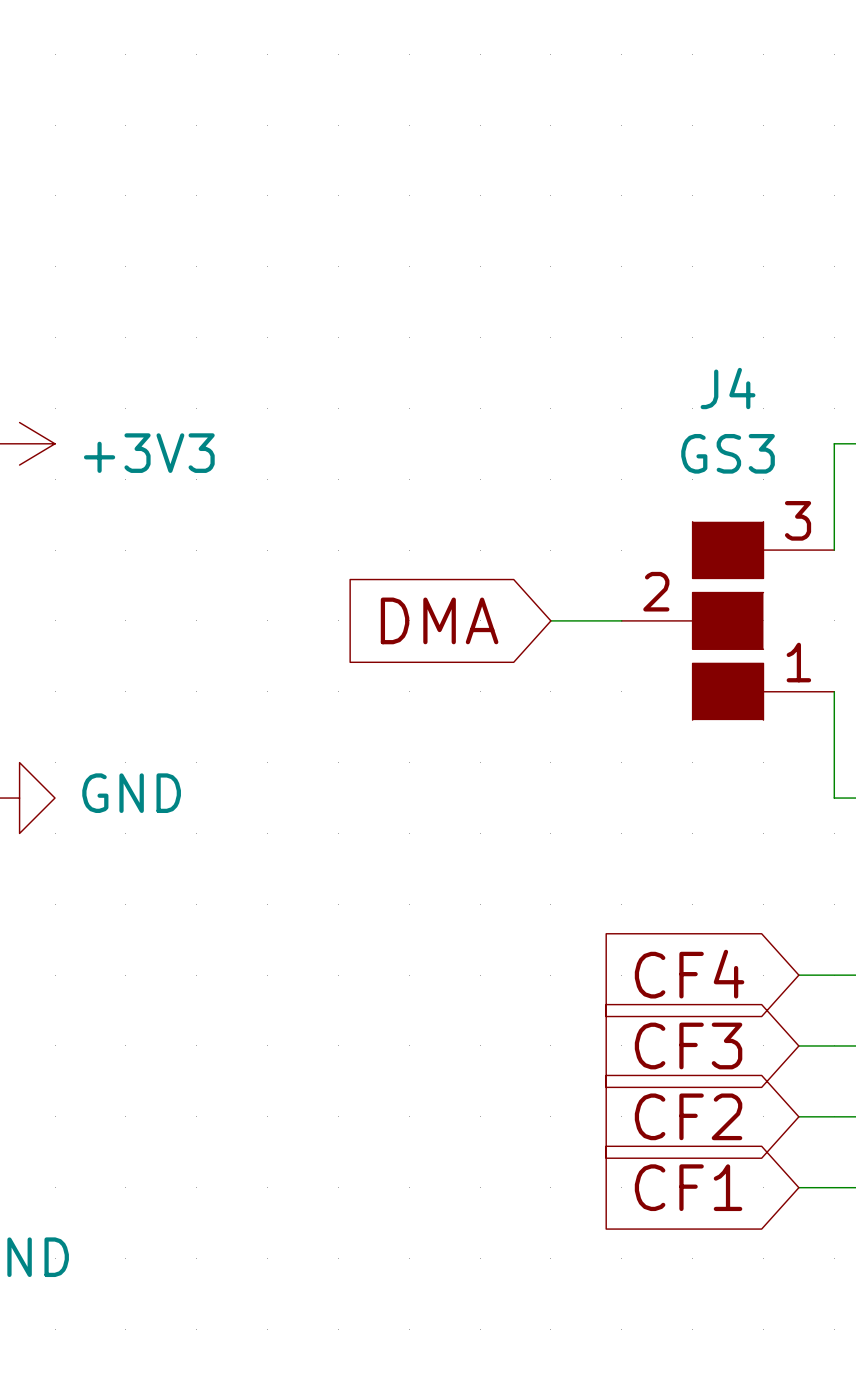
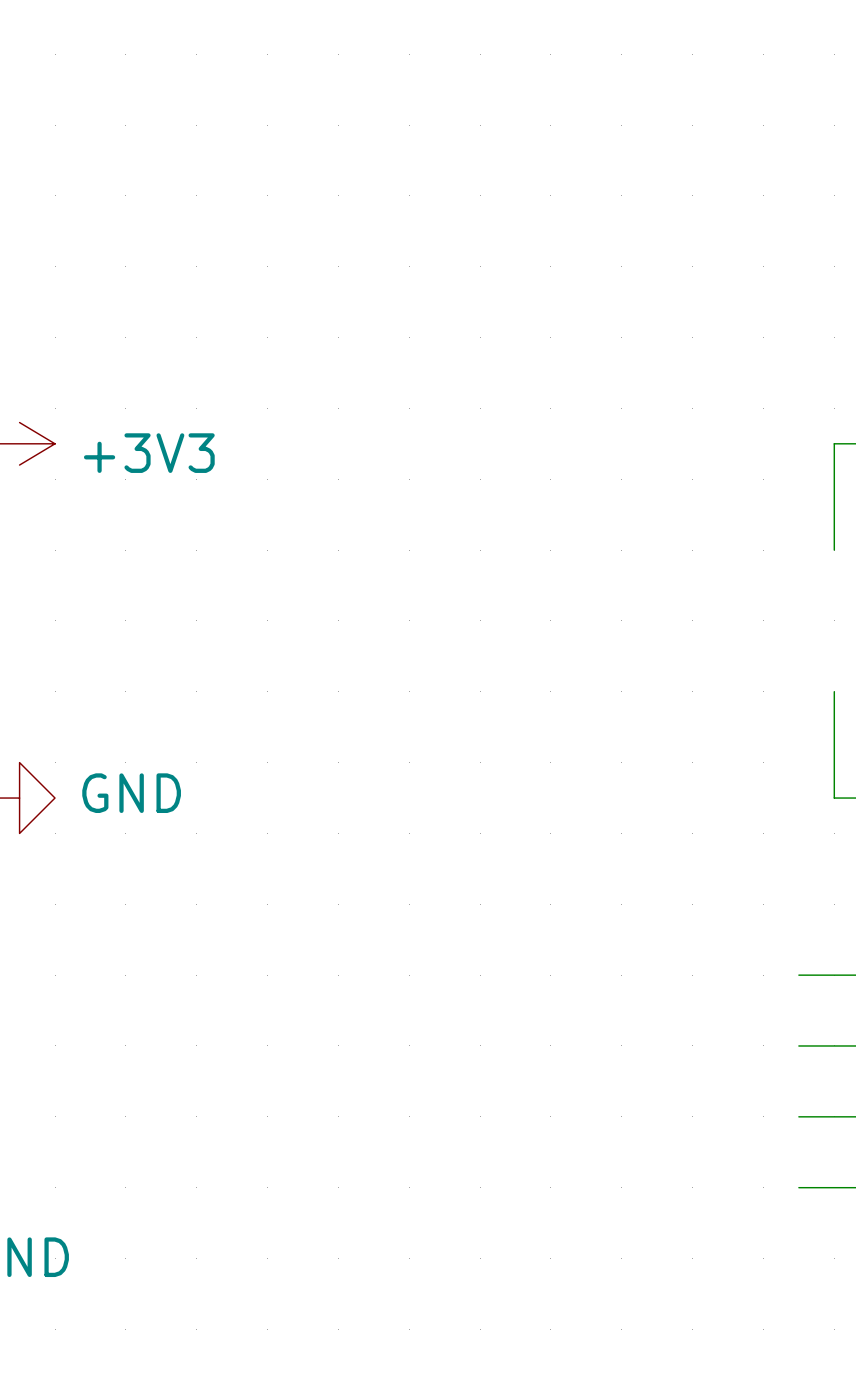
global label: DMA (439, 620) -> none
wire: (550, 620) (621, 620) -> none
J4: GS3 (728, 620) -> none
global label: CF4 (689, 974) -> none
global label: CF3 (688, 1045) -> none
global label: CF2 (688, 1116) -> none
global label: CF1 (688, 1187) -> none

